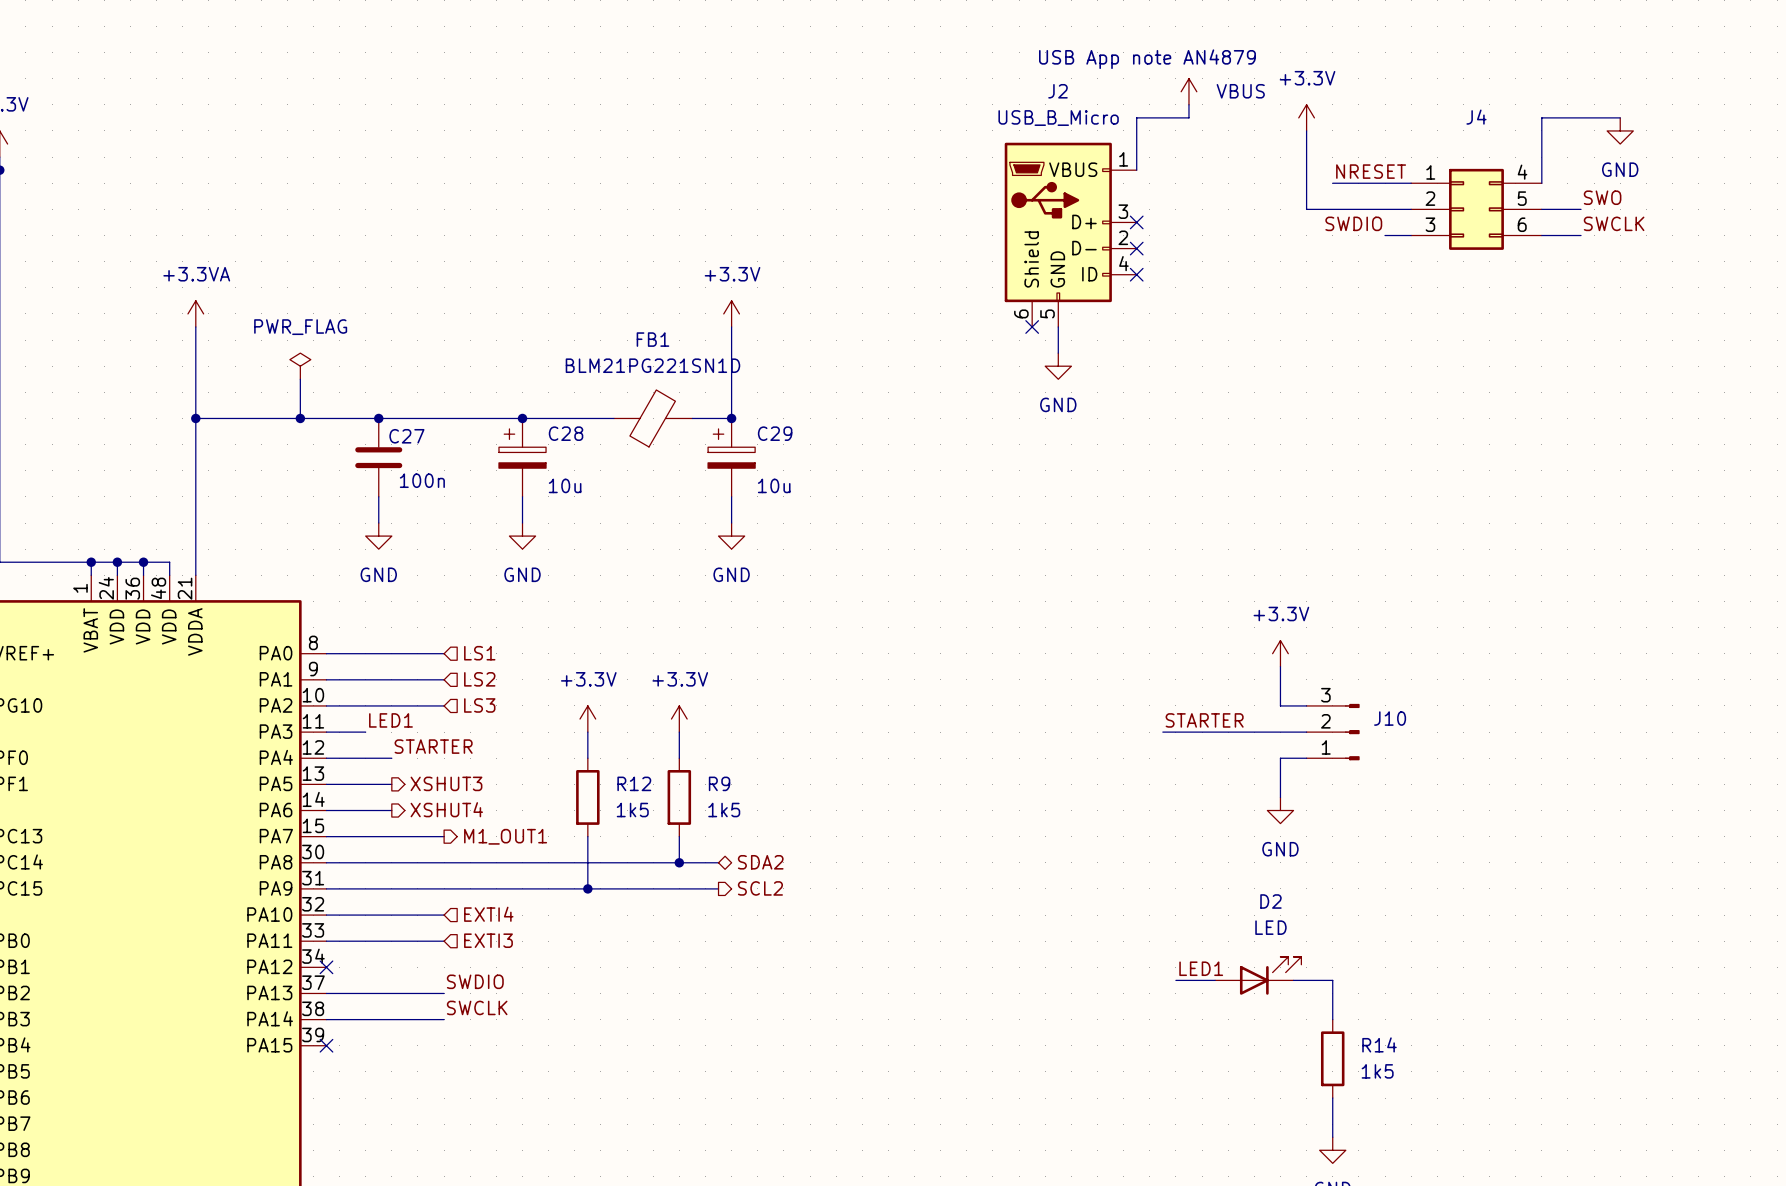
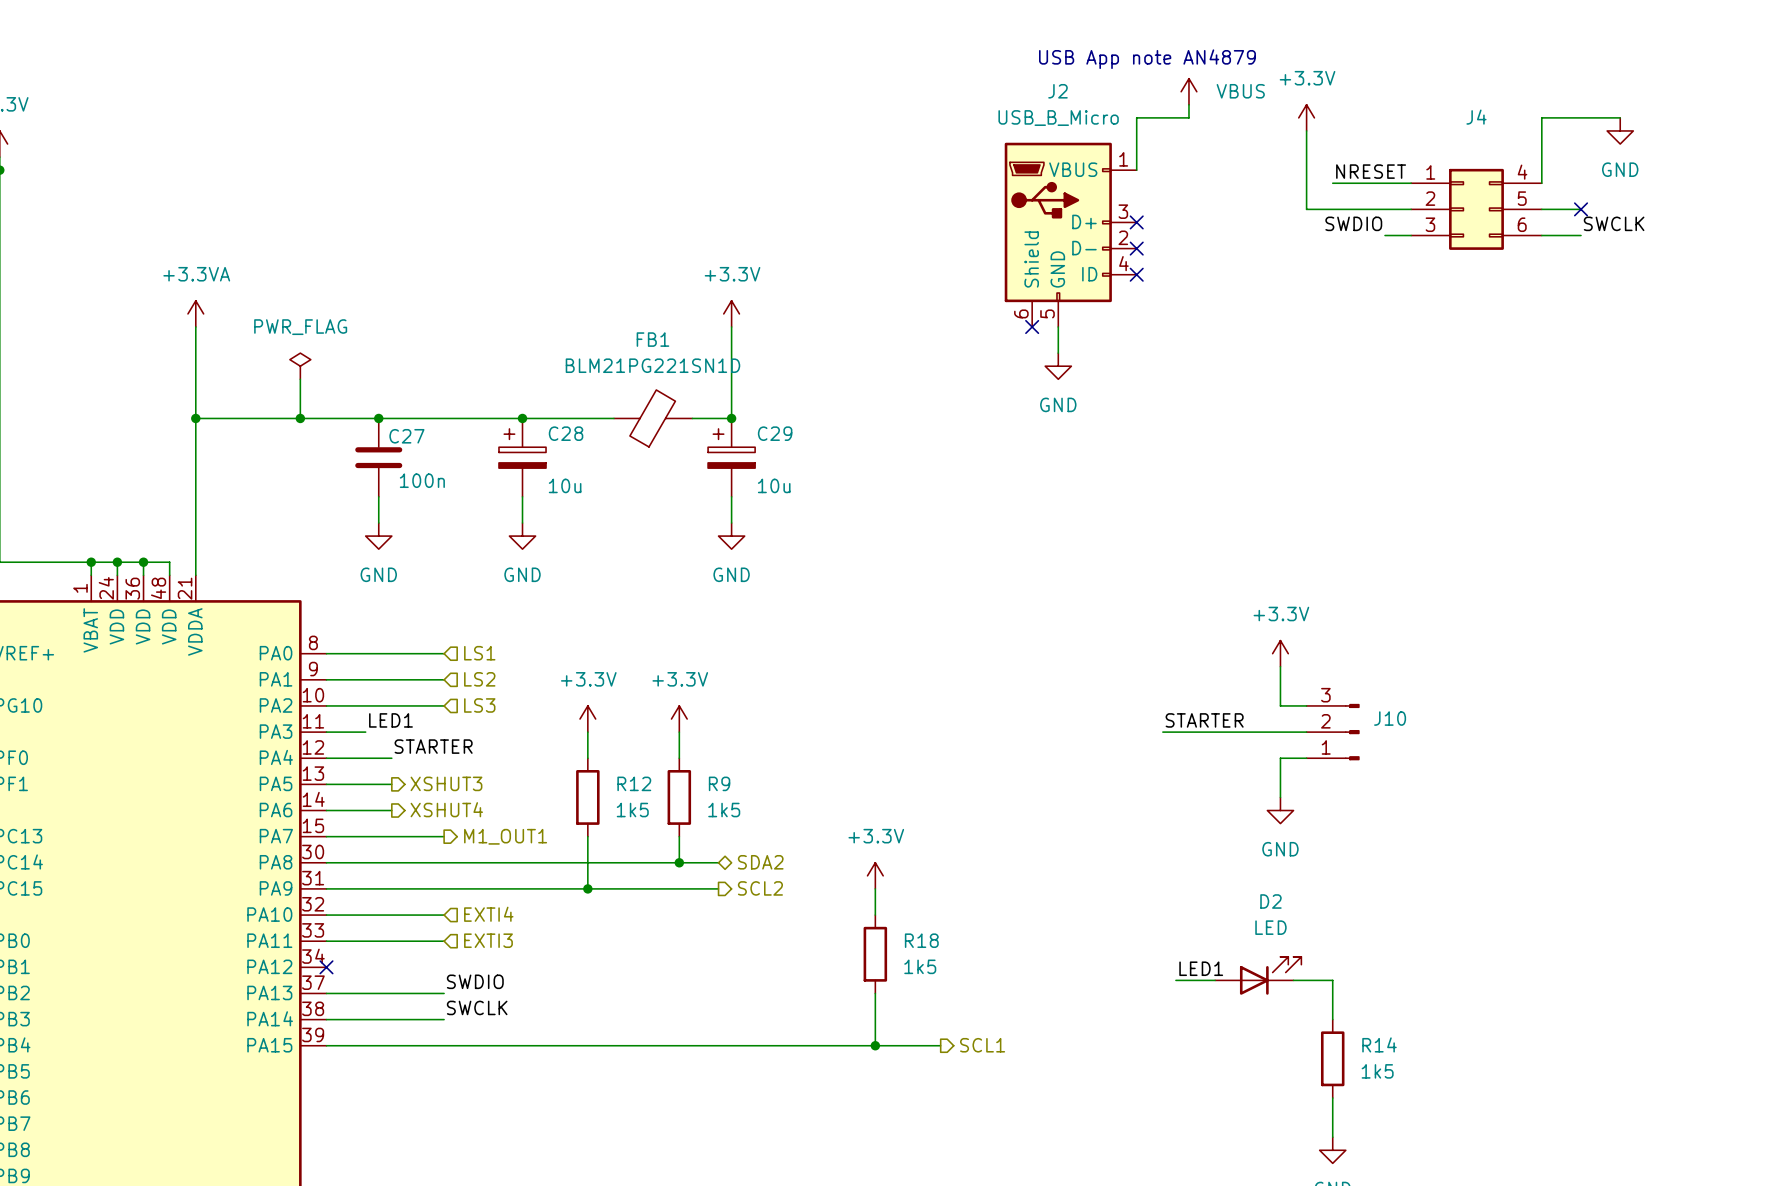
label: SWO (1602, 197) -> none
no-connect mark: none -> (1581, 209)
power symbol: none -> +3.3V (875, 875)
wire: none -> (875, 888) (875, 915)
R18: none -> 1k5 (875, 954)
wire: none -> (875, 993) (875, 1045)
wire: none -> (326, 1045) (940, 1045)
no-connect mark: (326, 1045) -> none
junction: none -> (875, 1045)
hierarchical label: none -> SCL1 (982, 1045)

